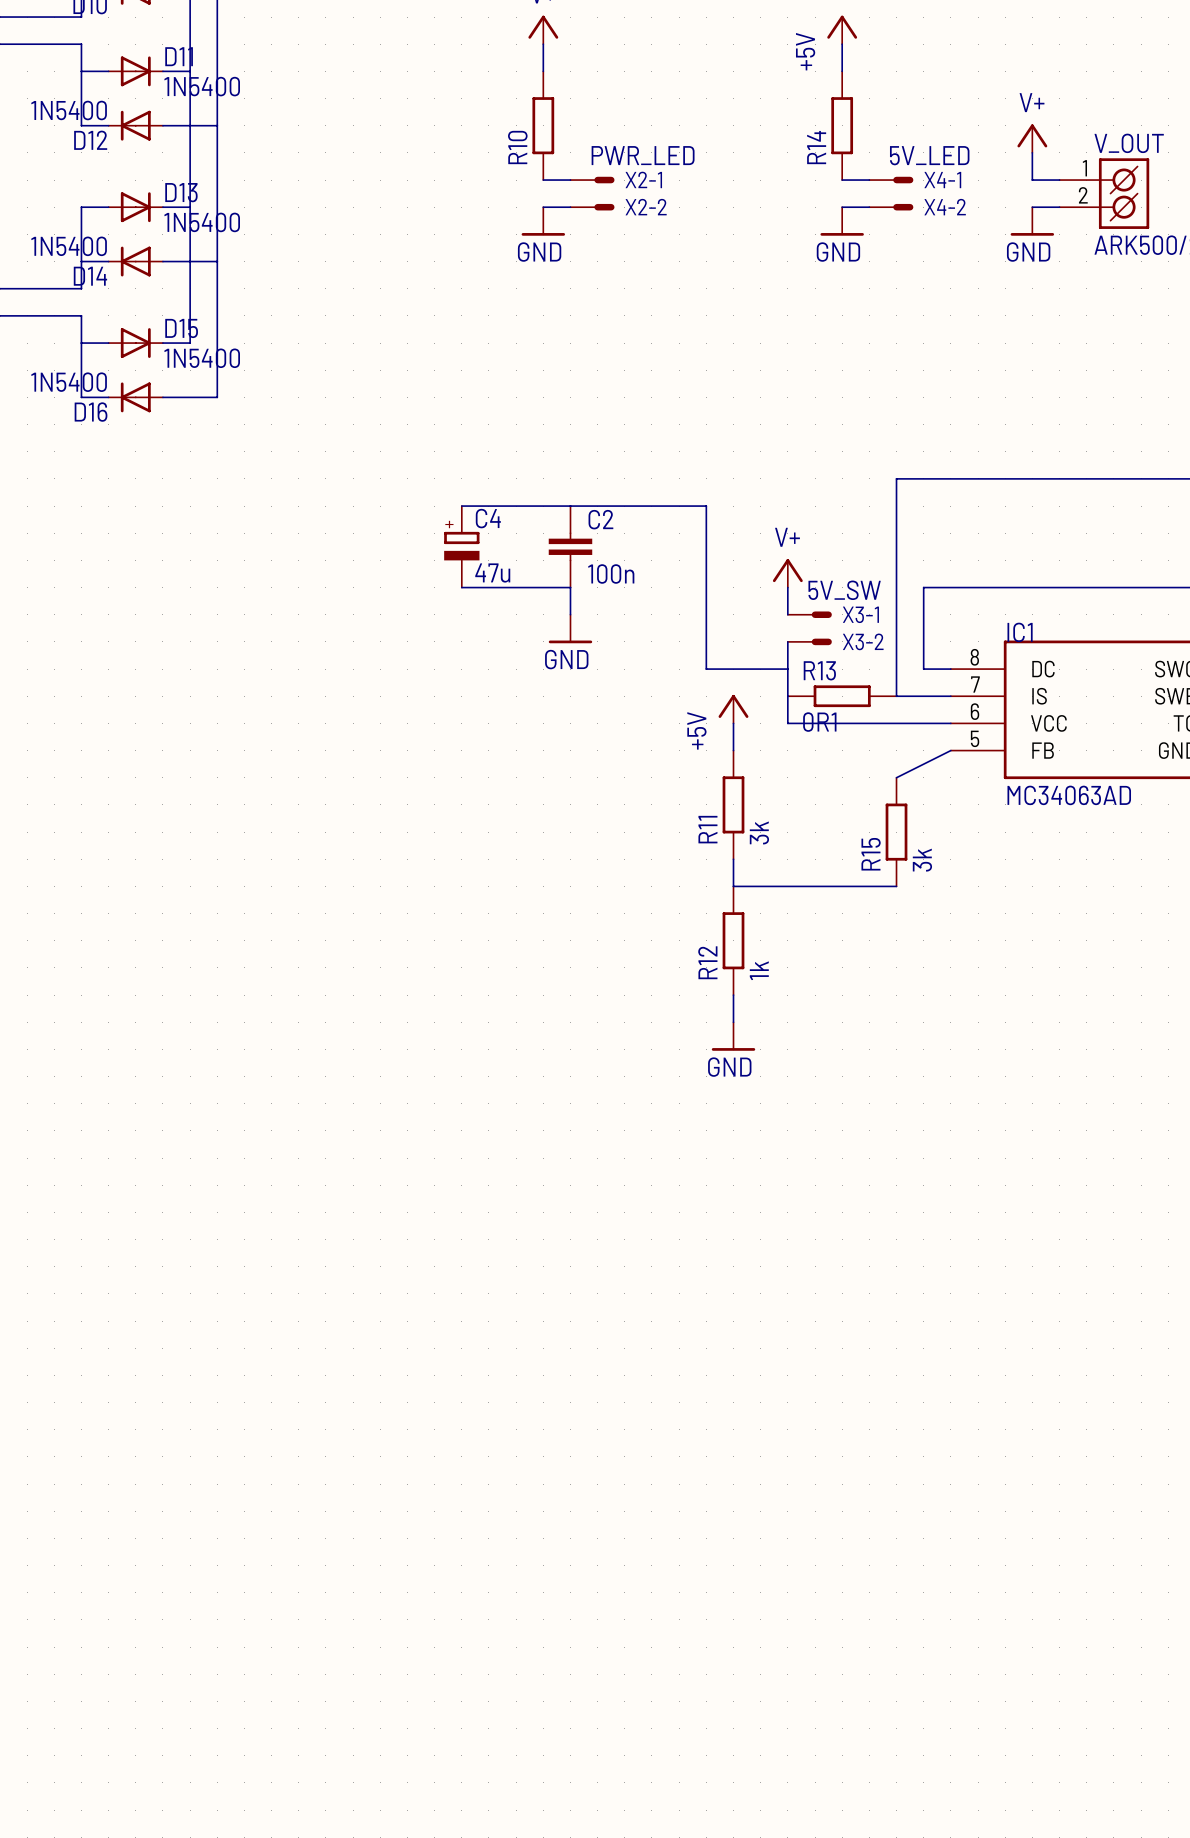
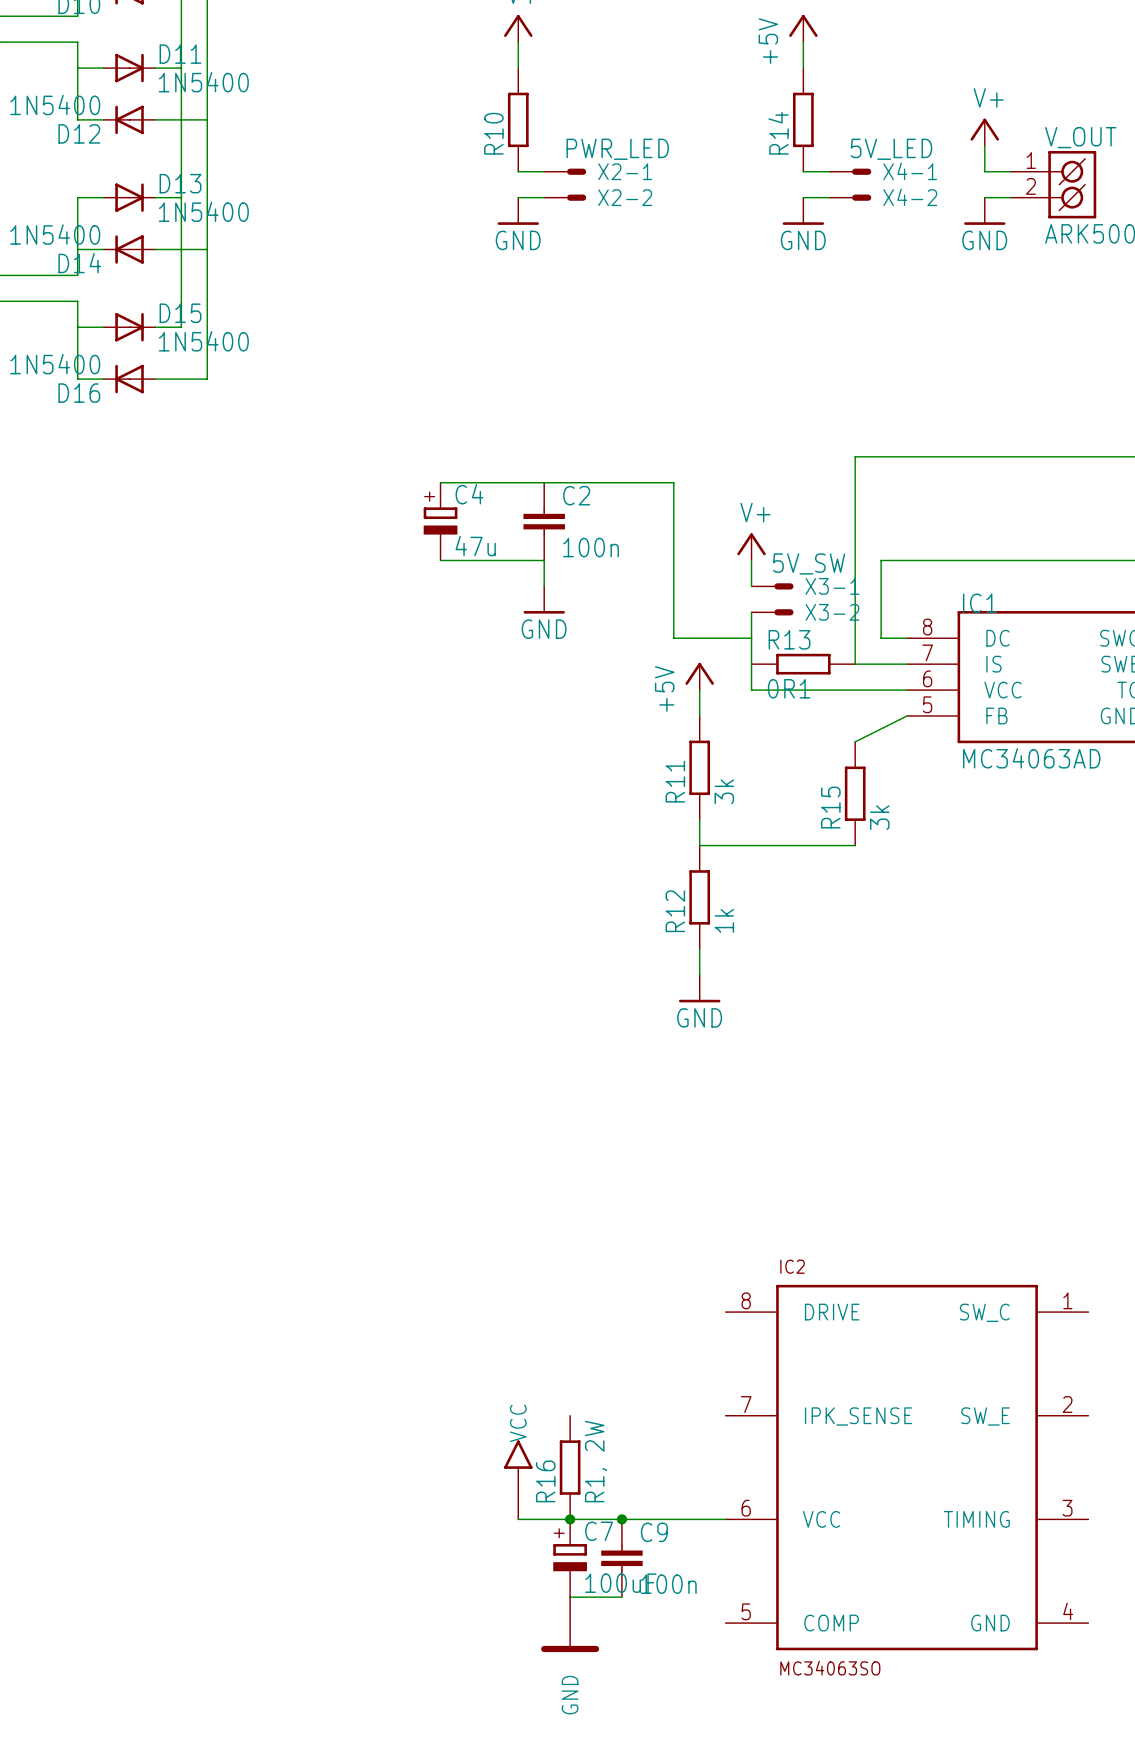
R16: none -> R1, 2W (570, 1467)
IC2: none -> MC34063SO (907, 1467)
power symbol: none -> (518, 1479)
wire: none -> (518, 1519) (725, 1519)
junction: none -> (570, 1519)
junction: none -> (621, 1519)
C7: none -> 100uF (570, 1558)
C9: none -> 100n (621, 1558)
wire: none -> (570, 1597) (621, 1597)
power symbol: none -> (570, 1624)

